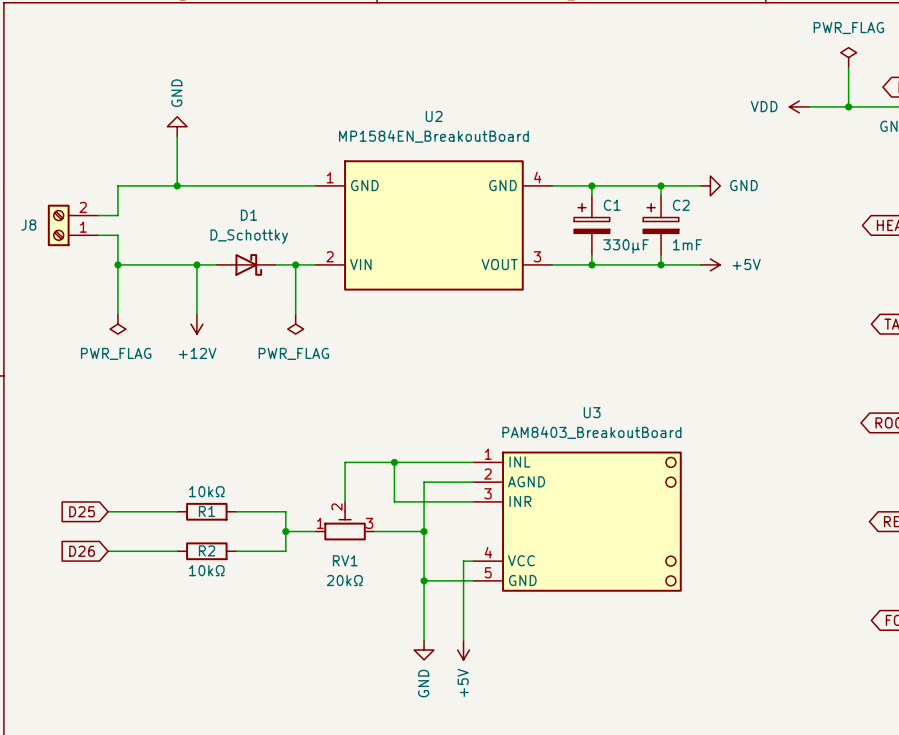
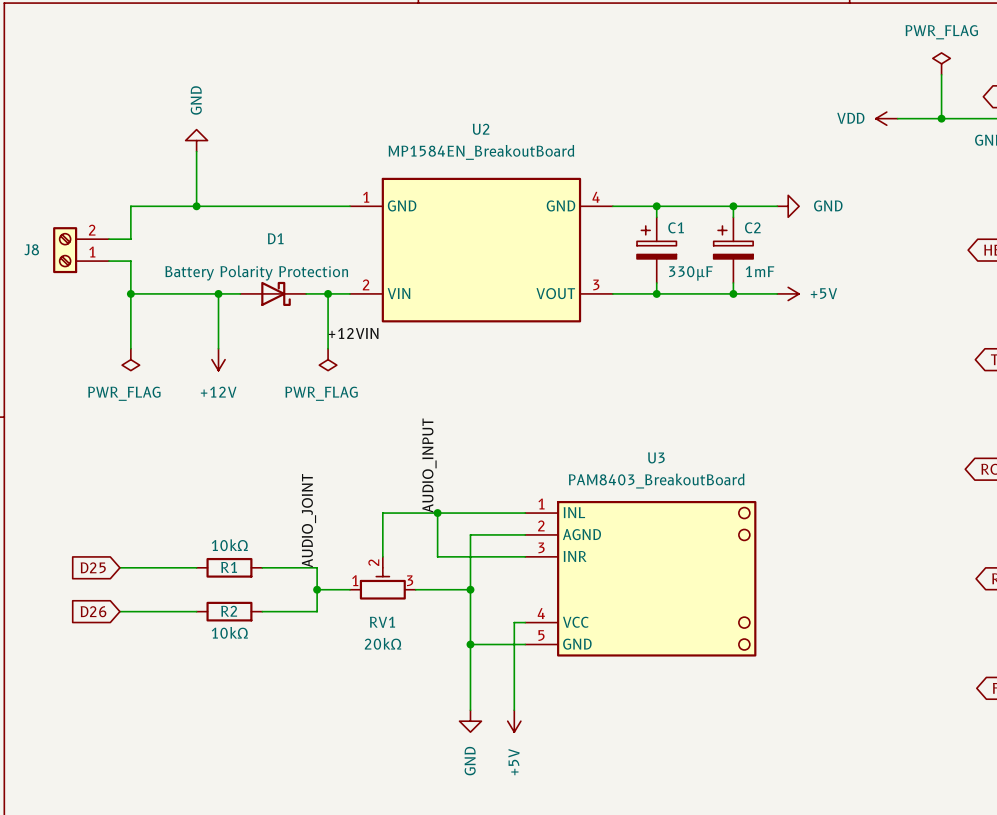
D1 value: D_Schottky (249, 236) -> Battery Polarity Protection (256, 272)
label: none -> +12VIN (353, 333)
label: none -> AUDIO_INPUT (429, 465)
label: none -> AUDIO_JOINT (308, 520)

